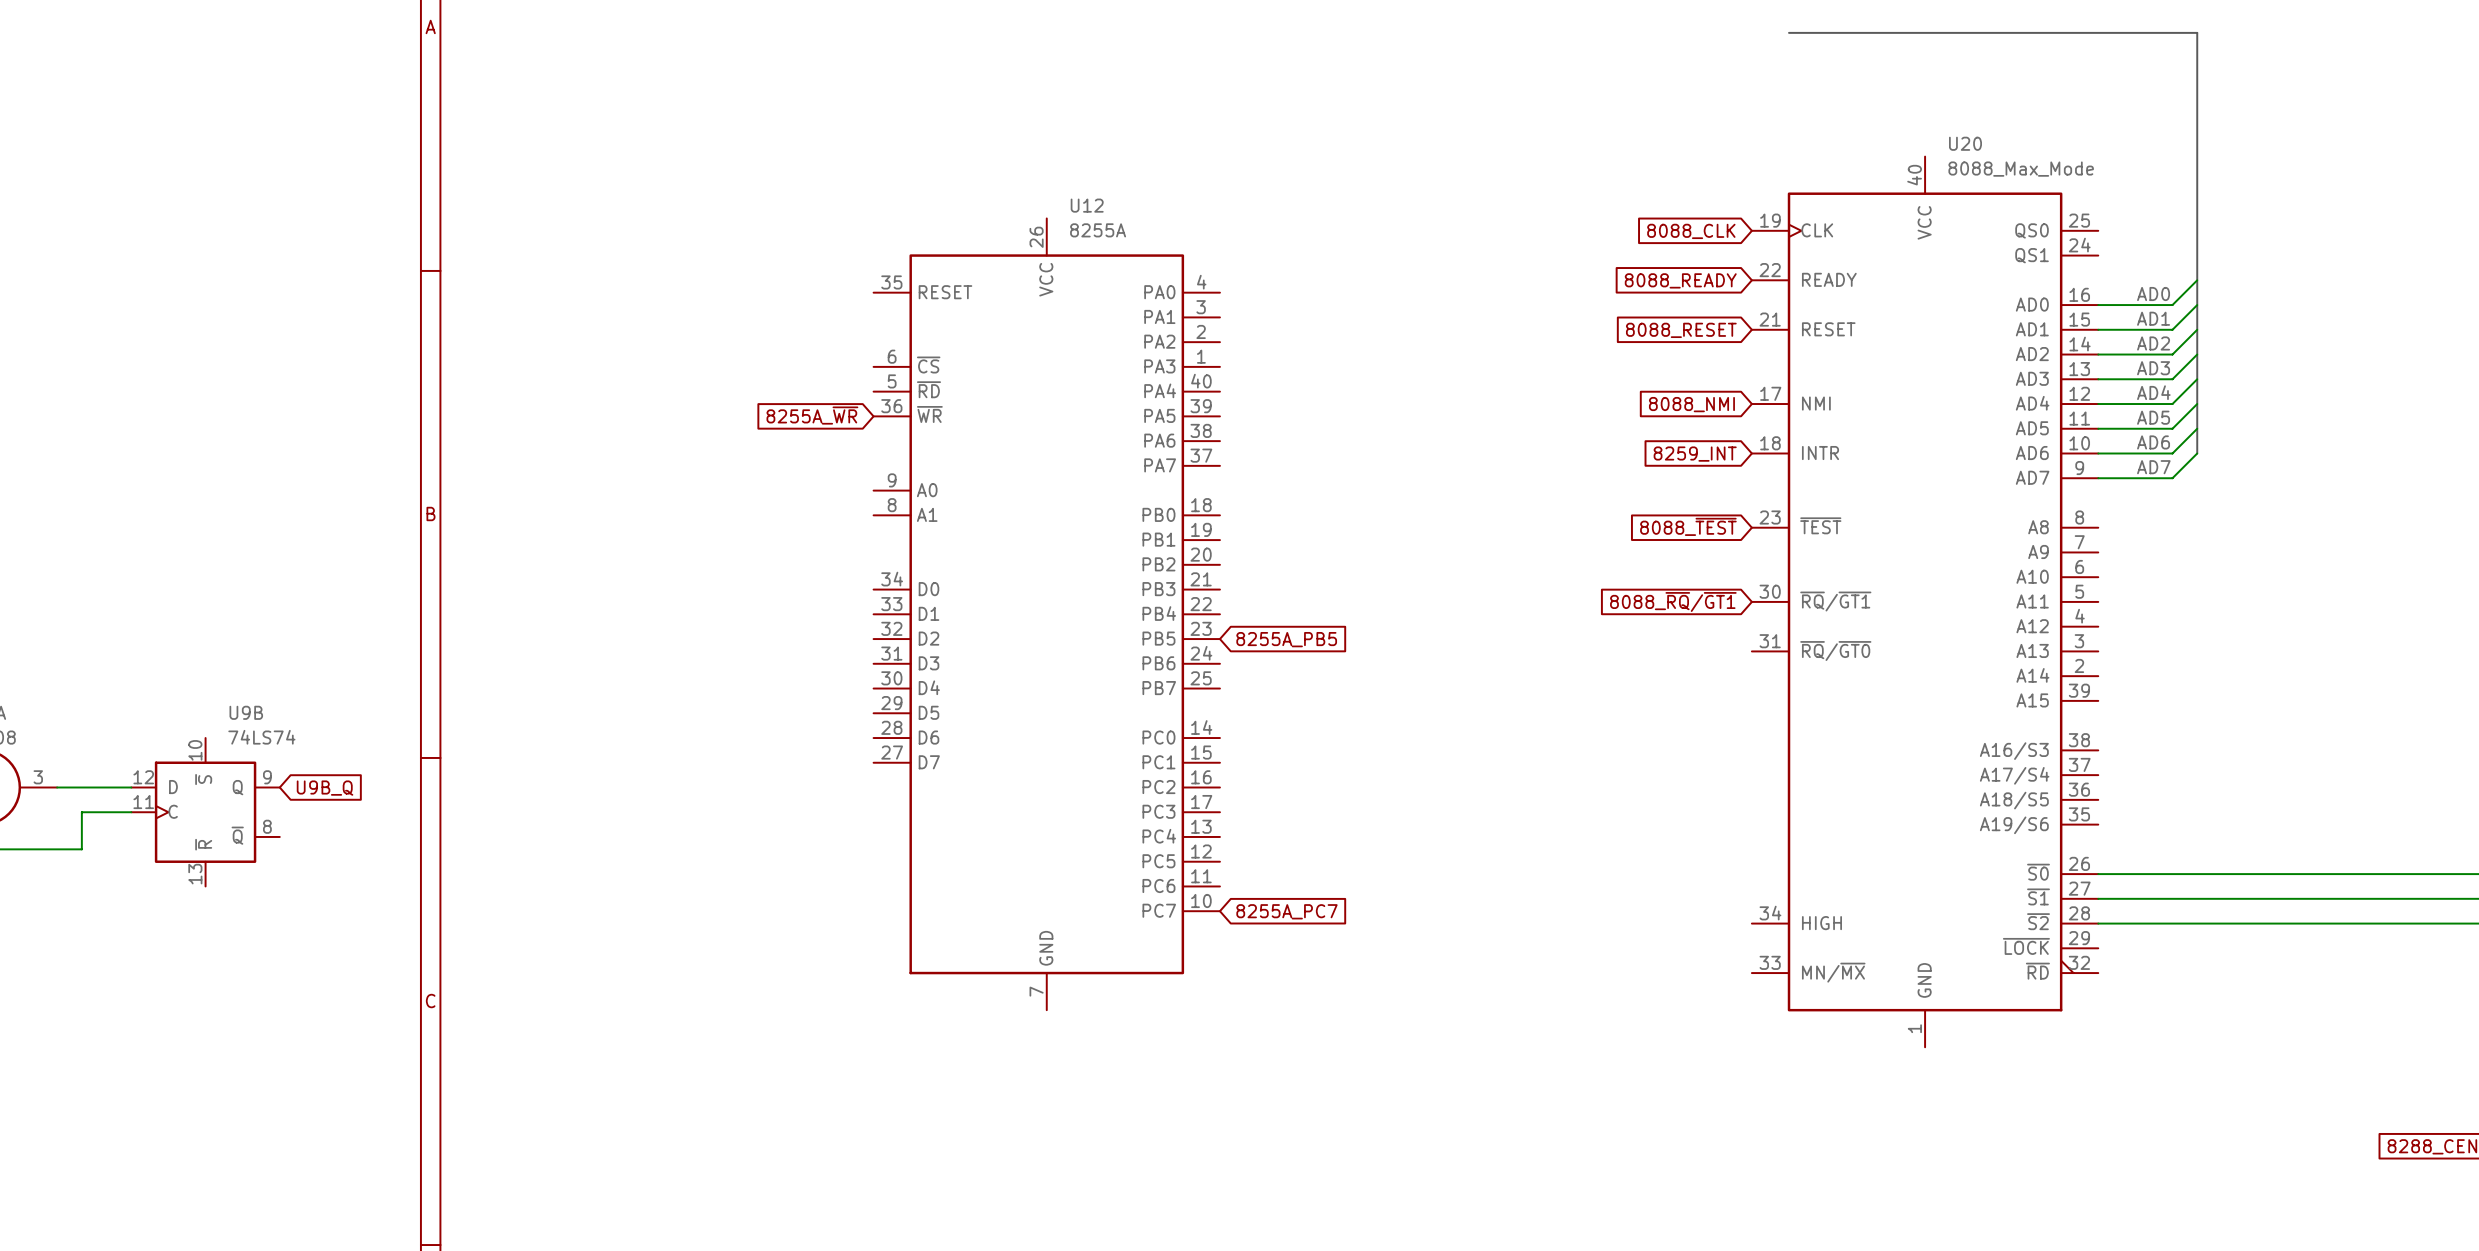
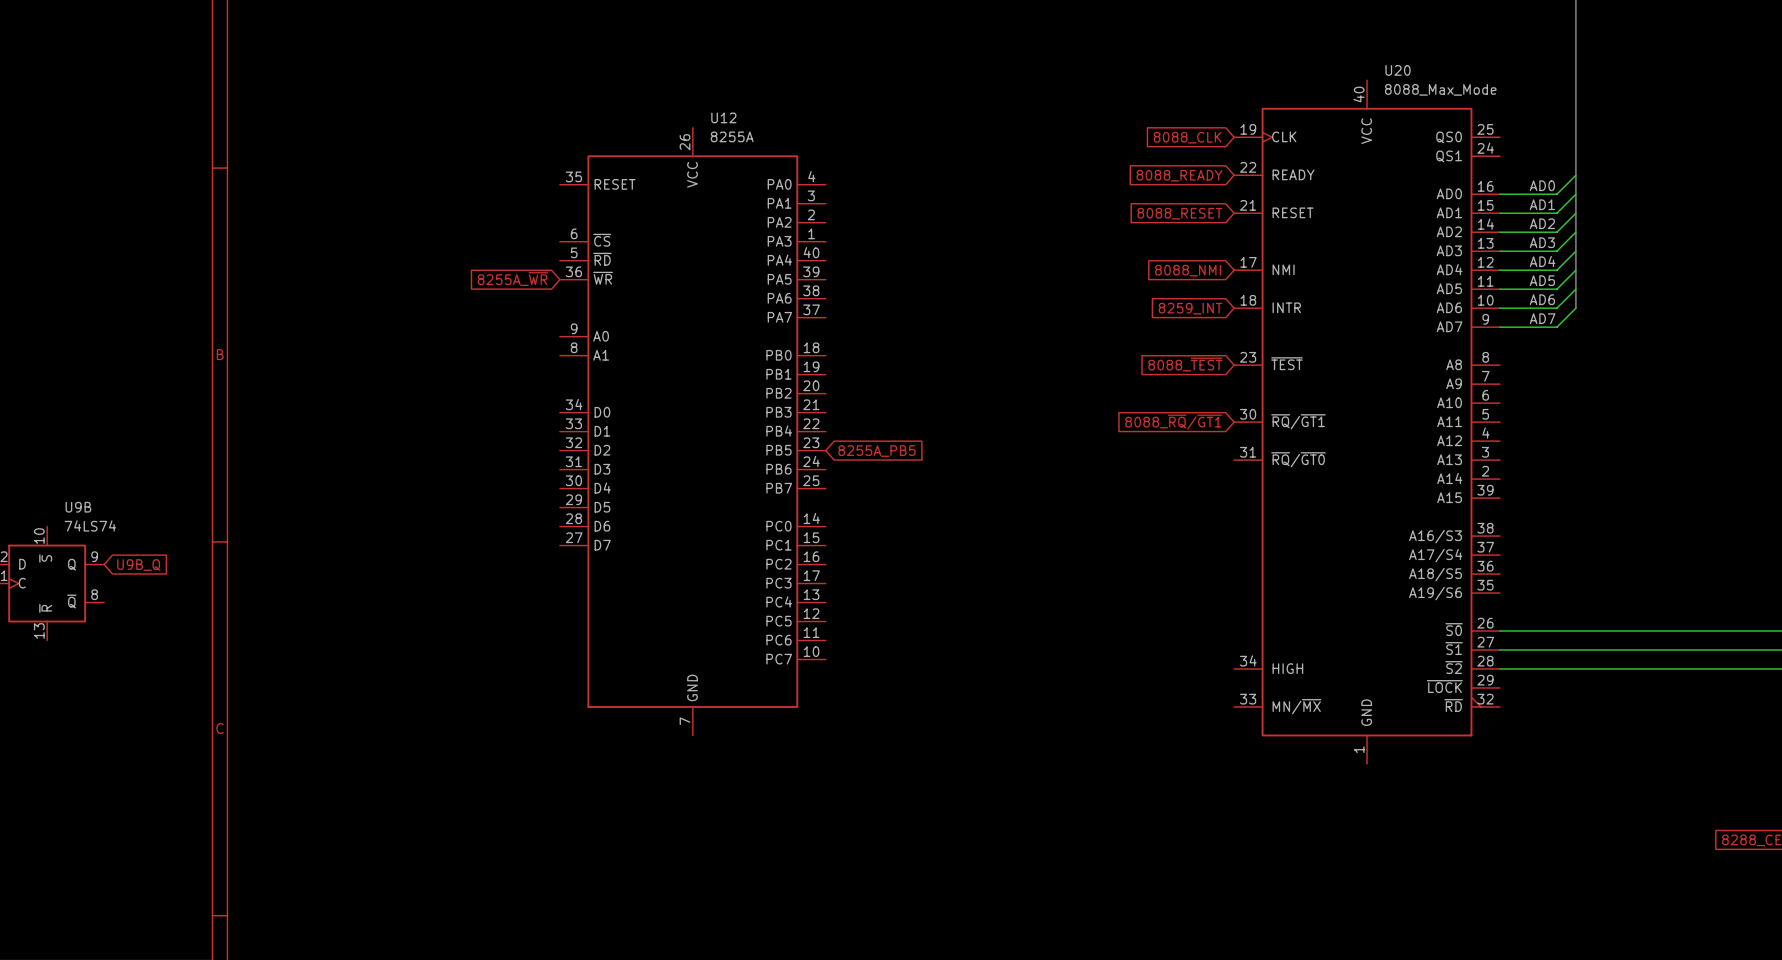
global label: 8255A_PC7 (1286, 911) -> none

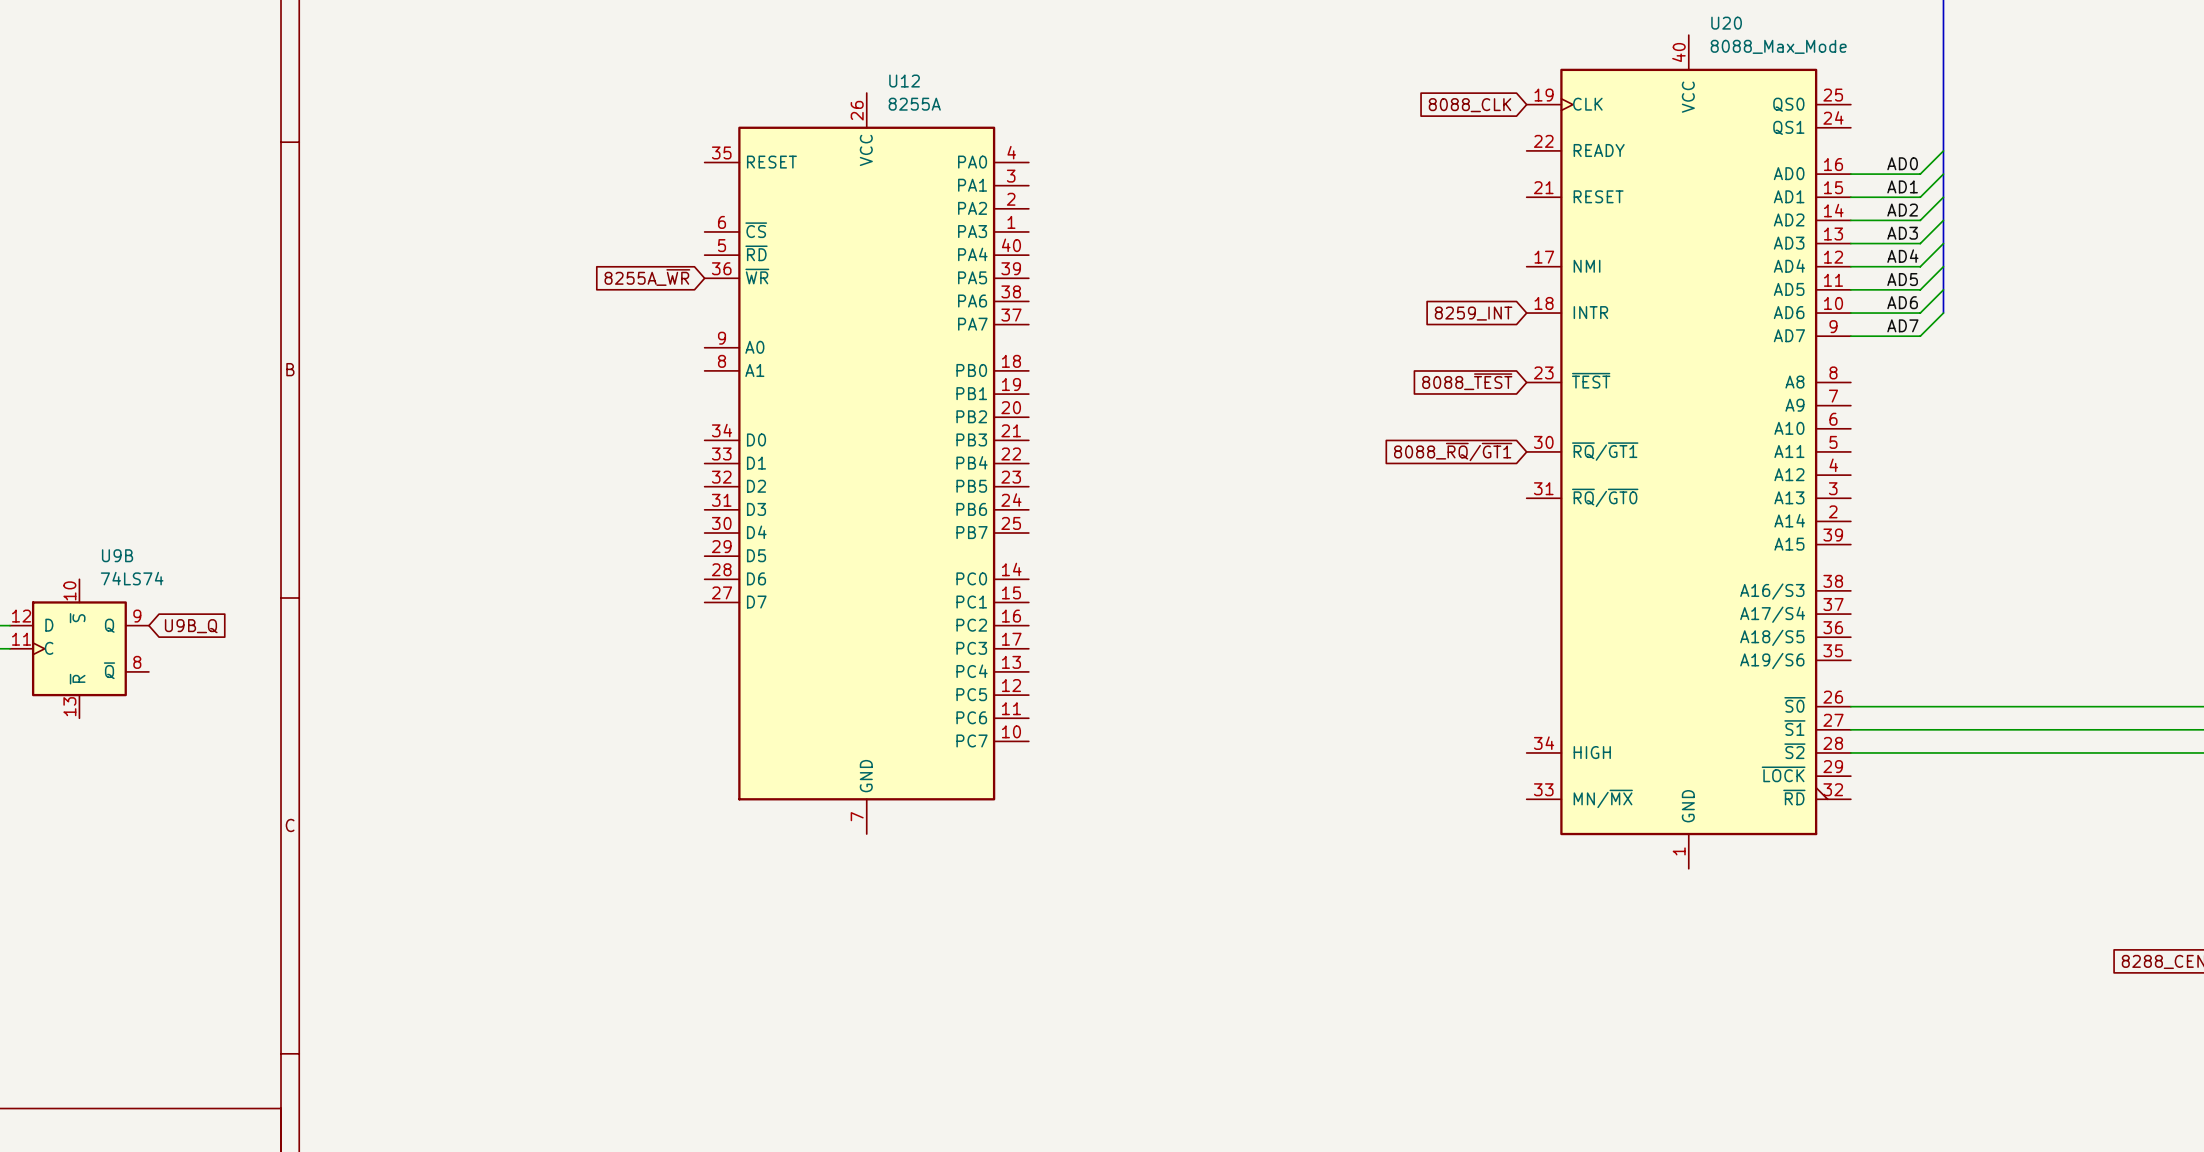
global label: 8088_READY (1179, 175) -> none
global label: 8088_RESET (1179, 213) -> none
global label: 8088_NMI (1188, 270) -> none
global label: 8255A_PB5 (877, 451) -> none

